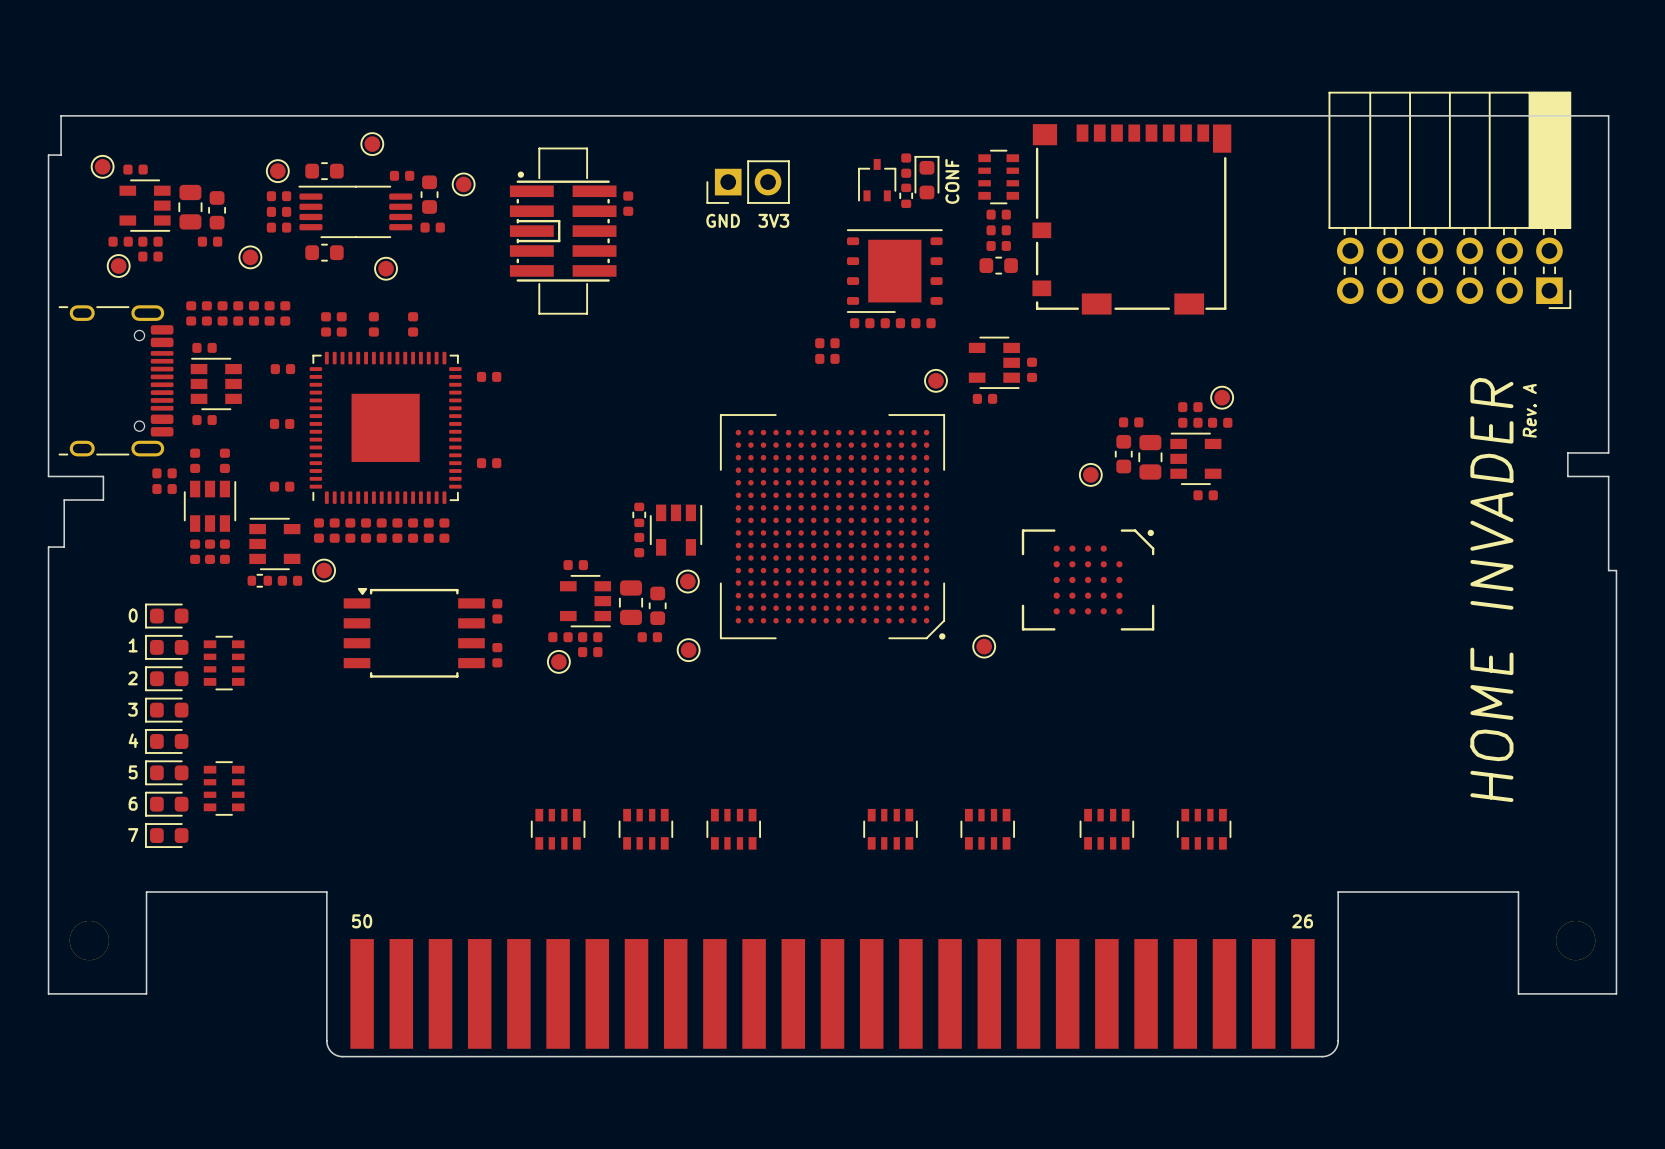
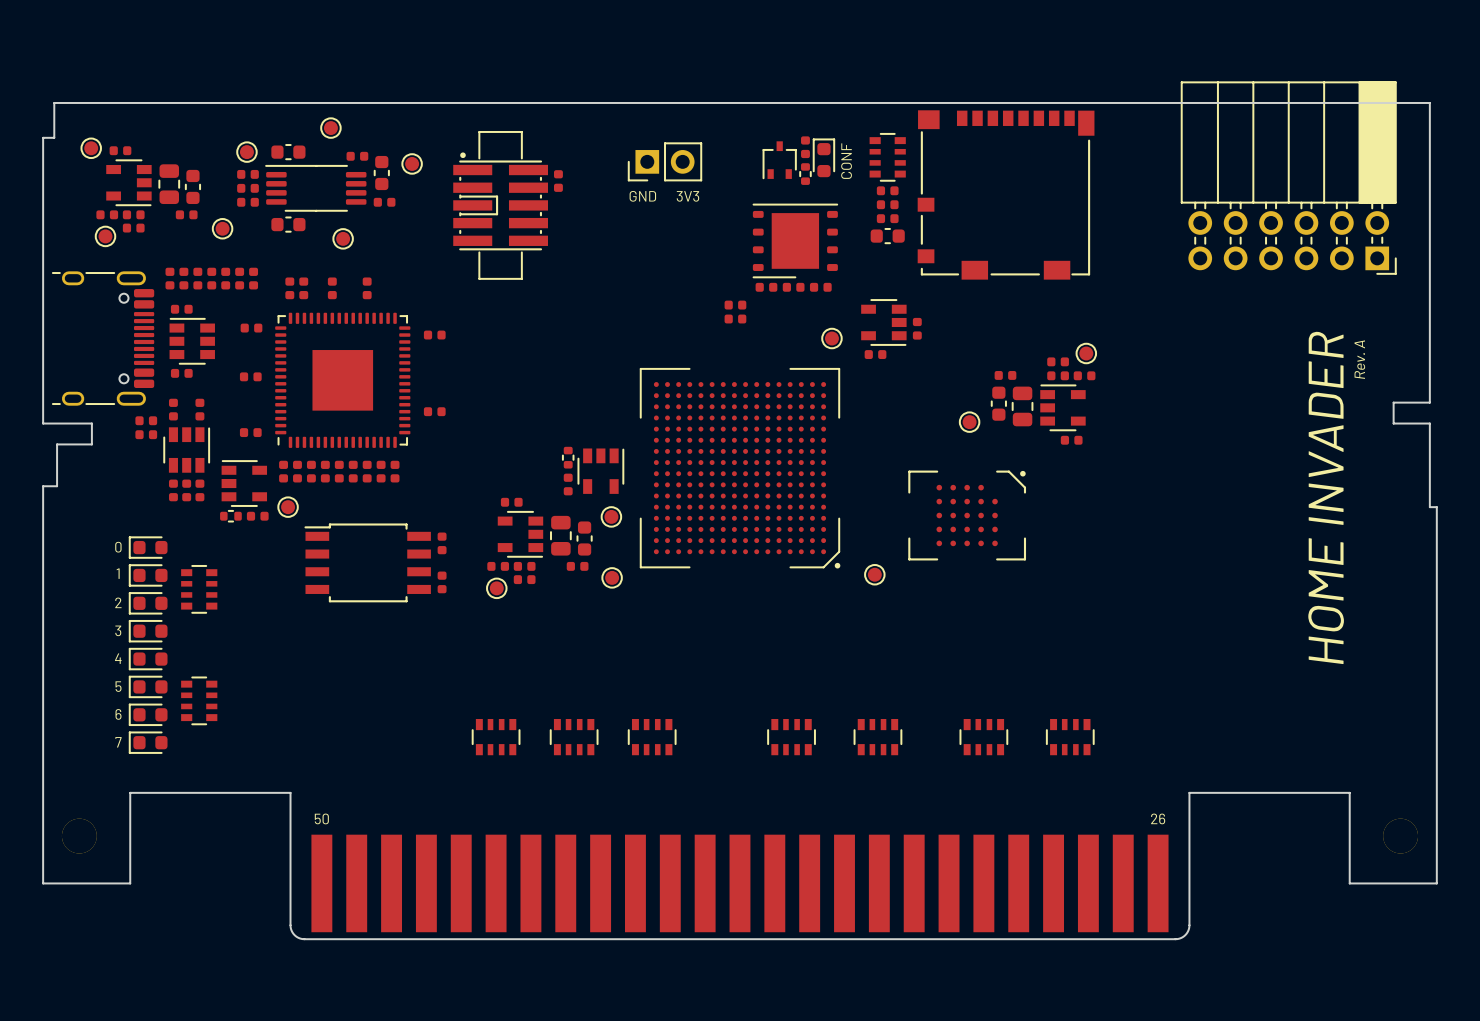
part footprint: [343, 587, 485, 678] -> [304, 523, 431, 603]

